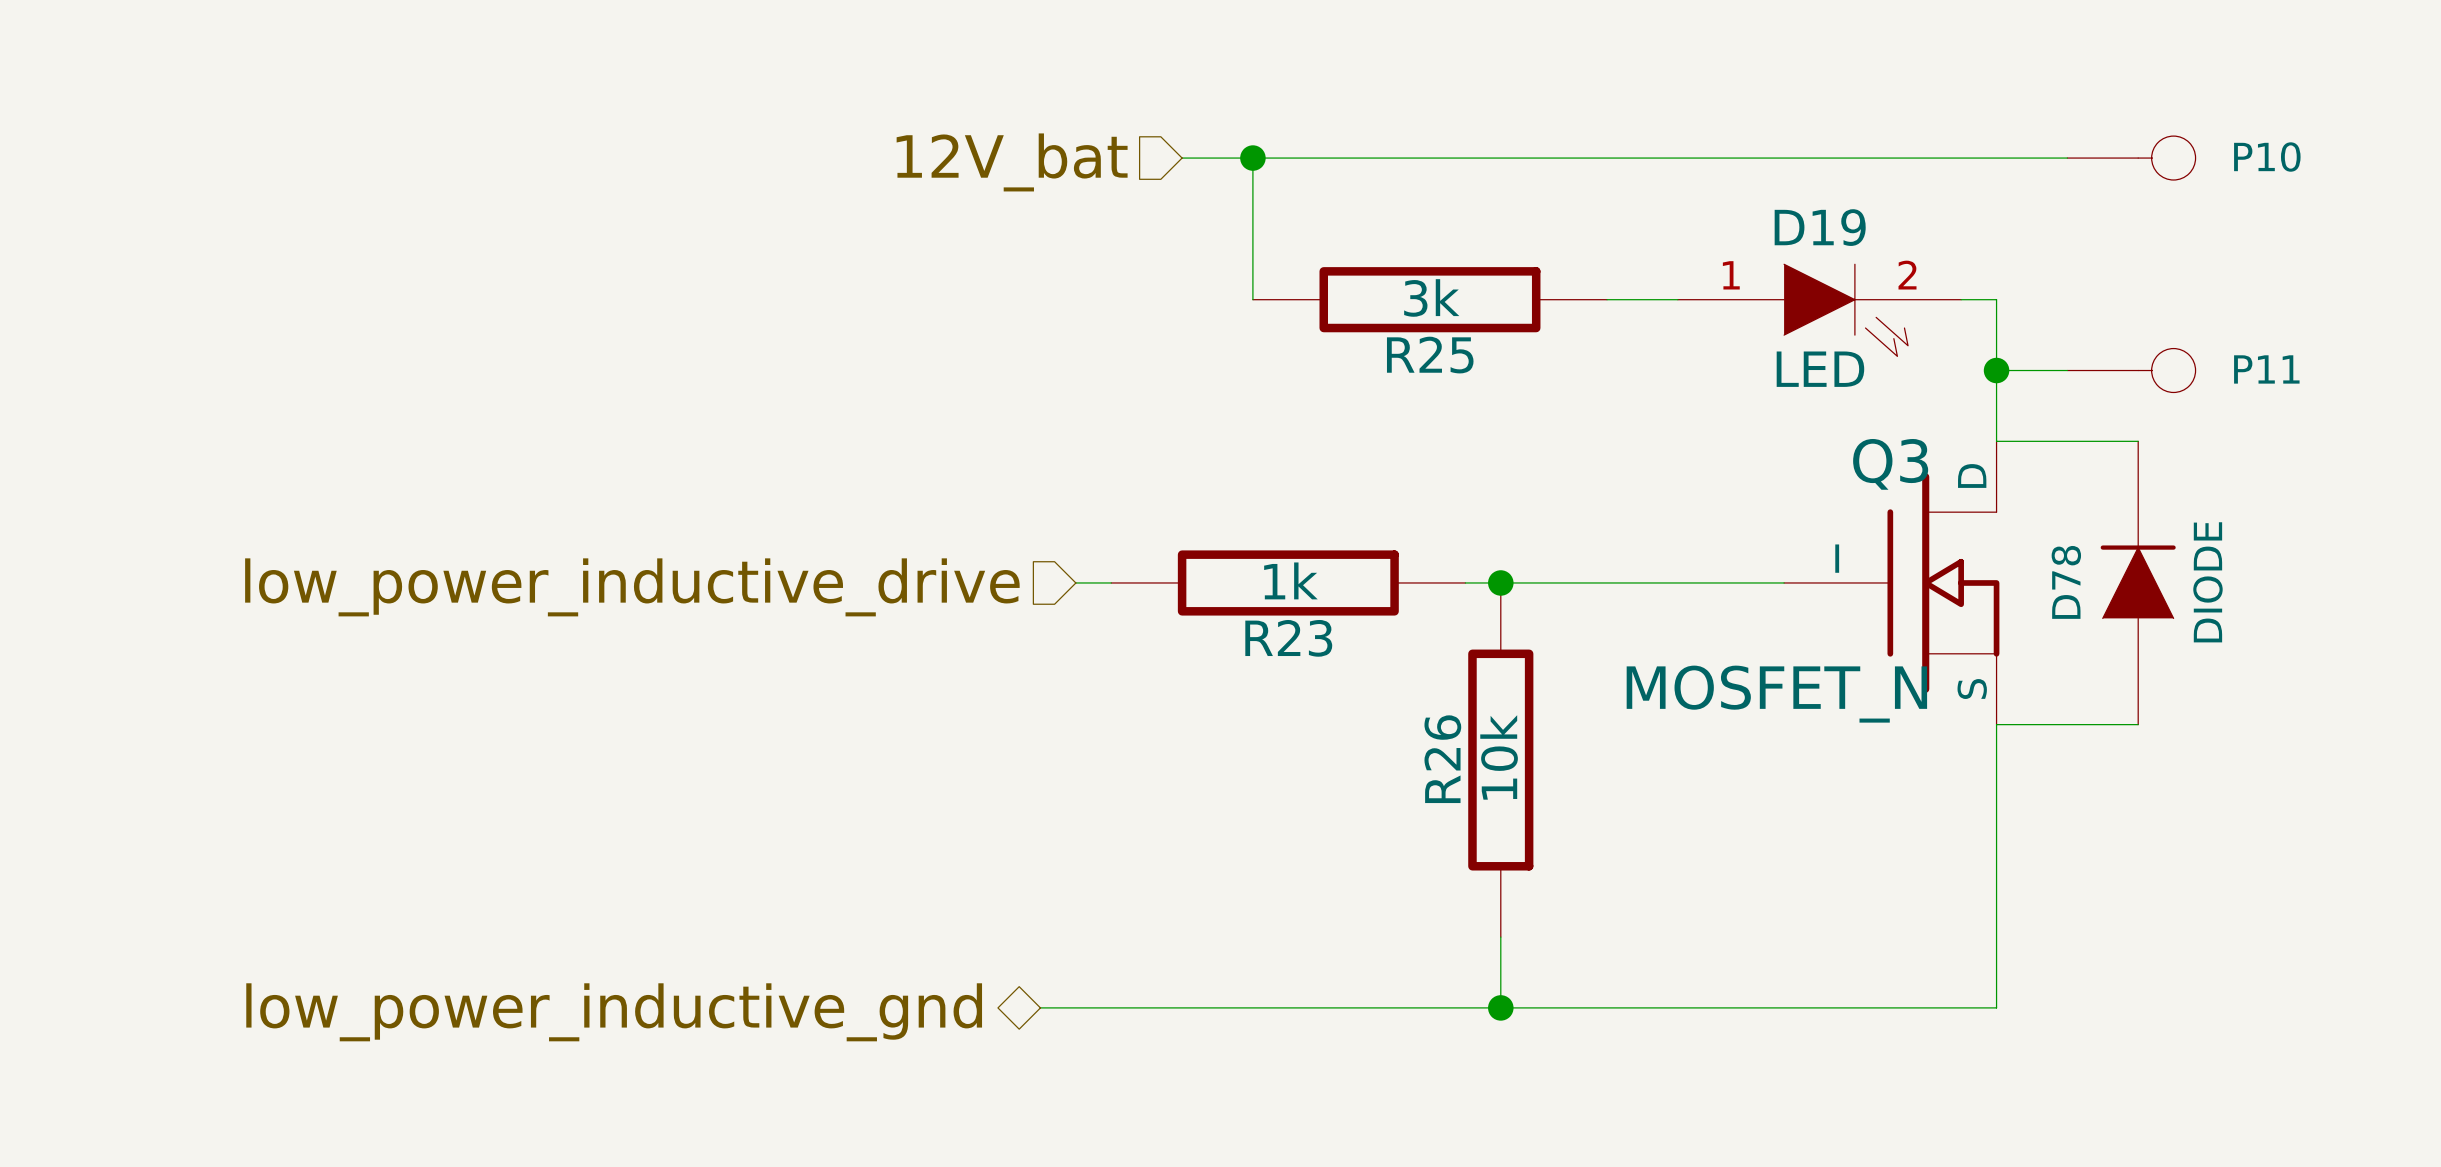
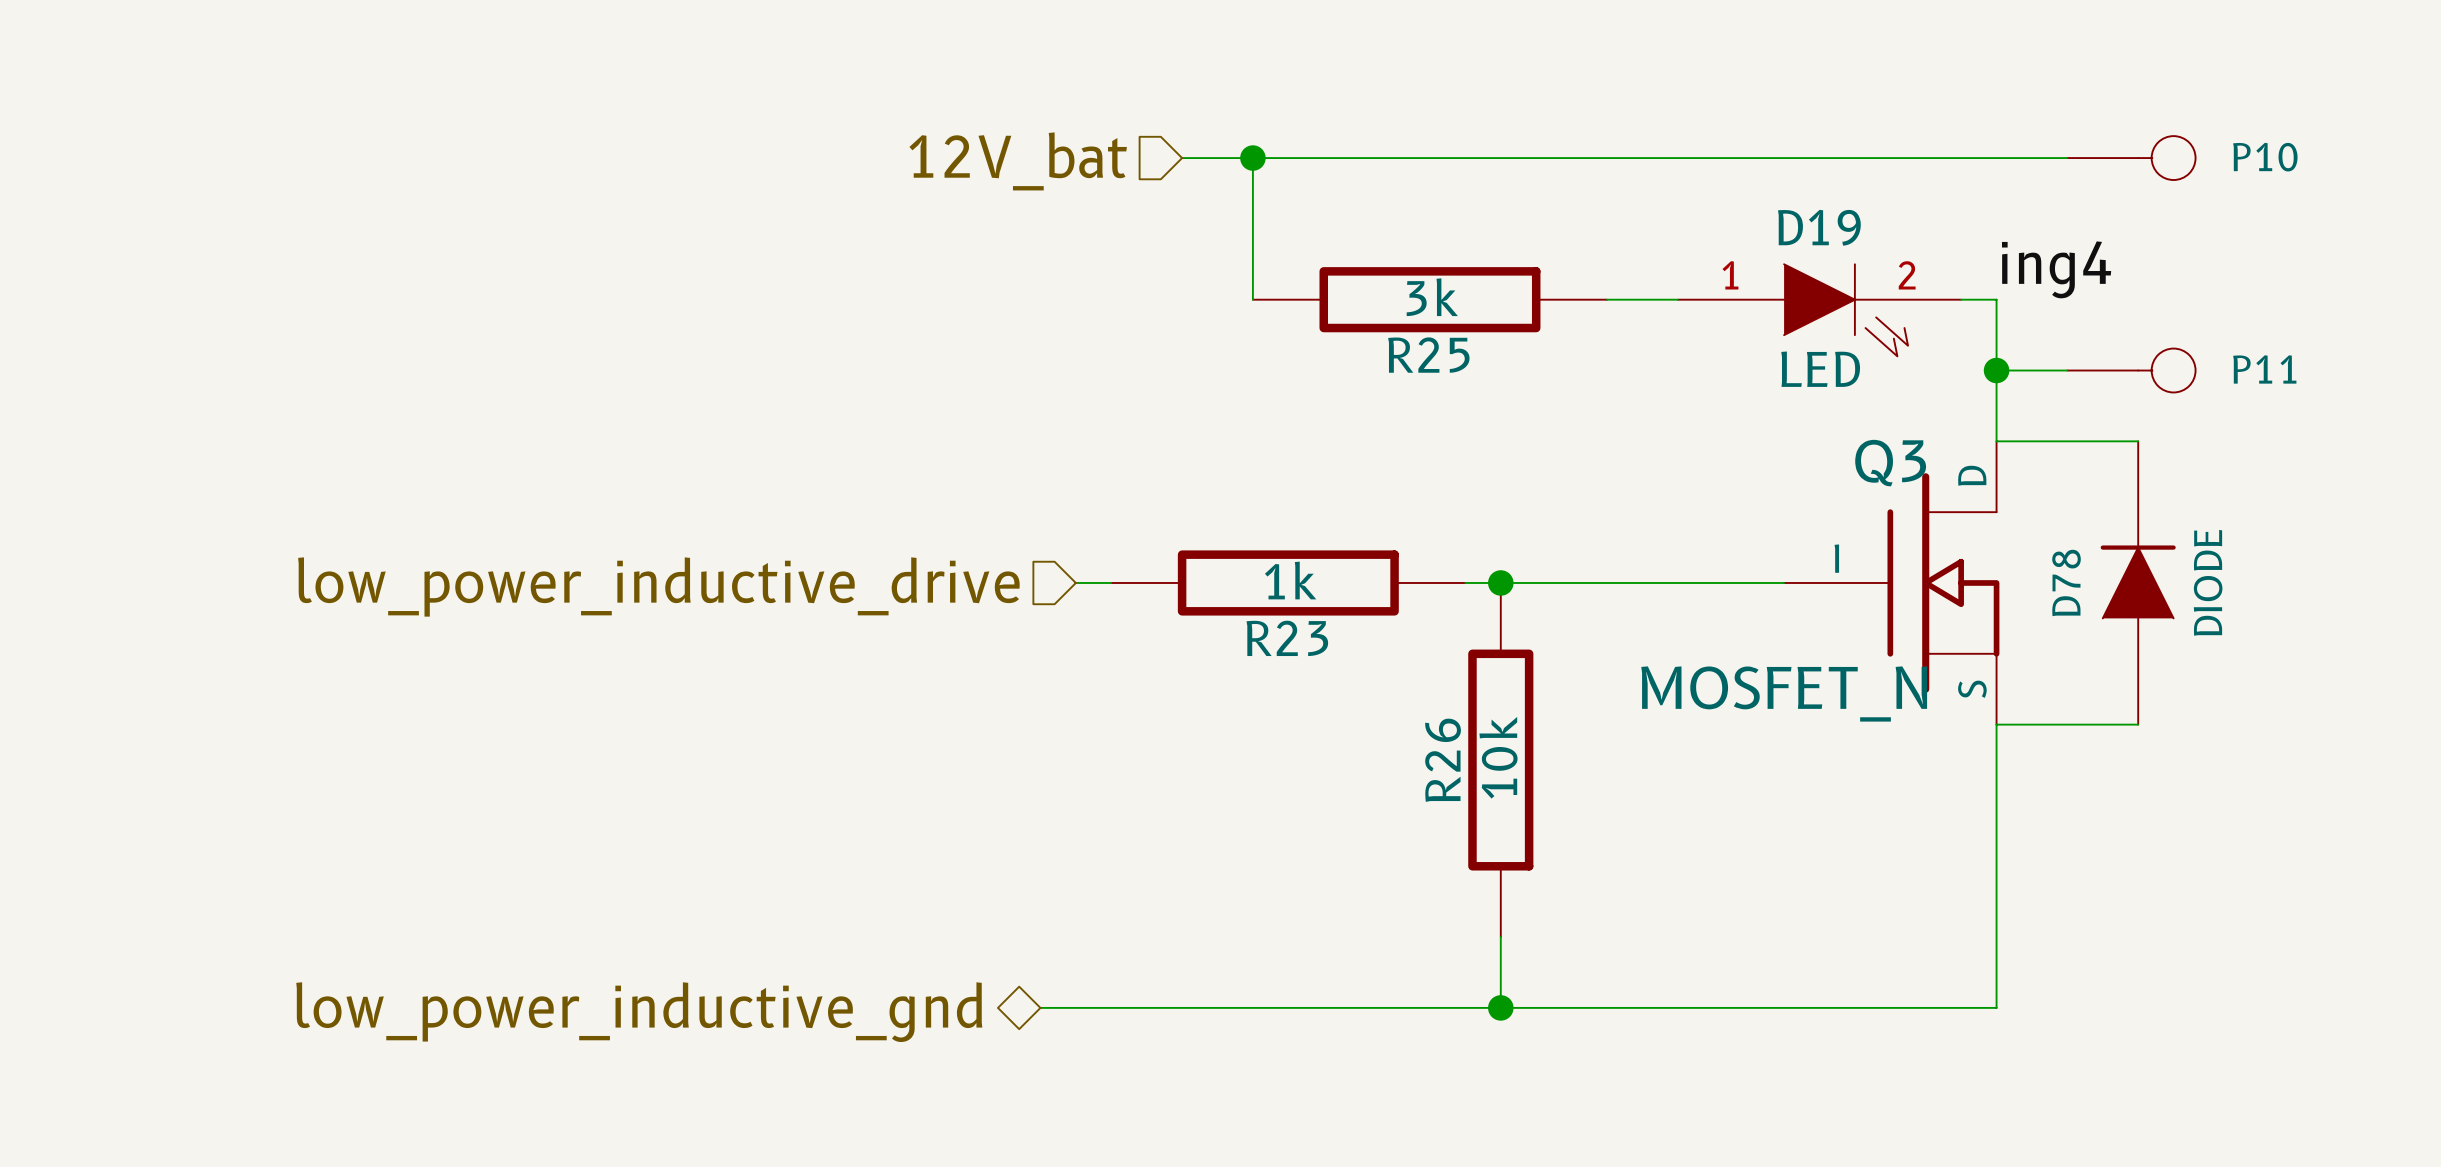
label: none -> ing4 (2056, 269)

